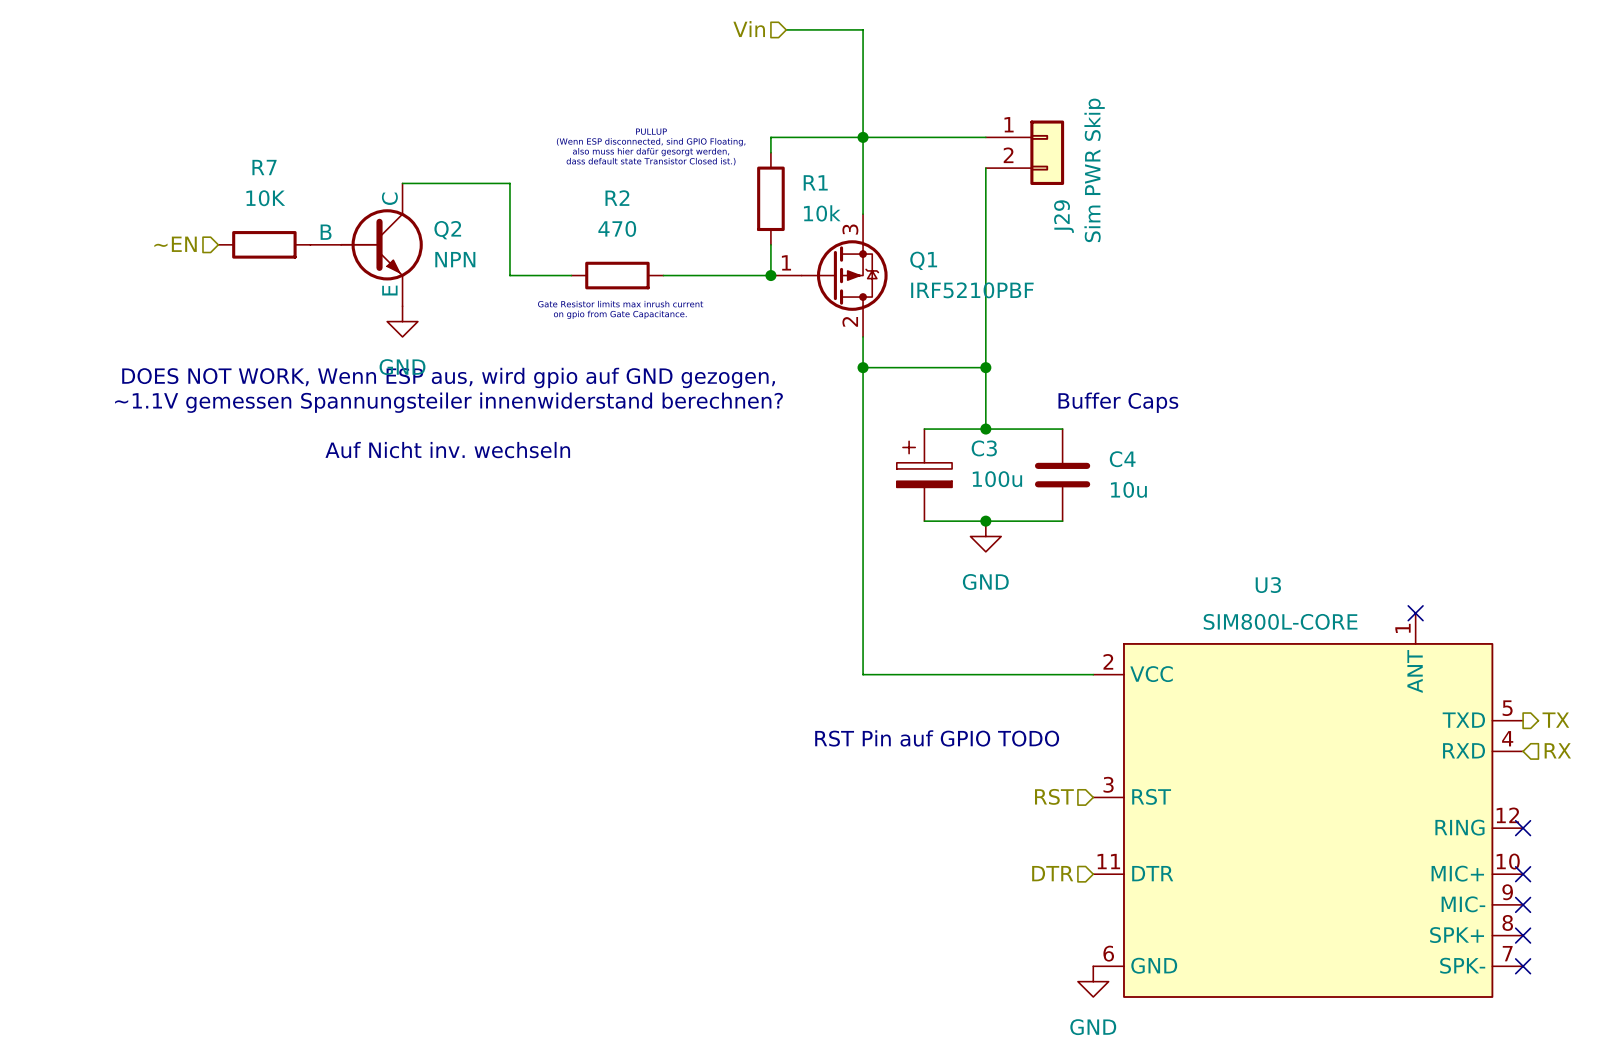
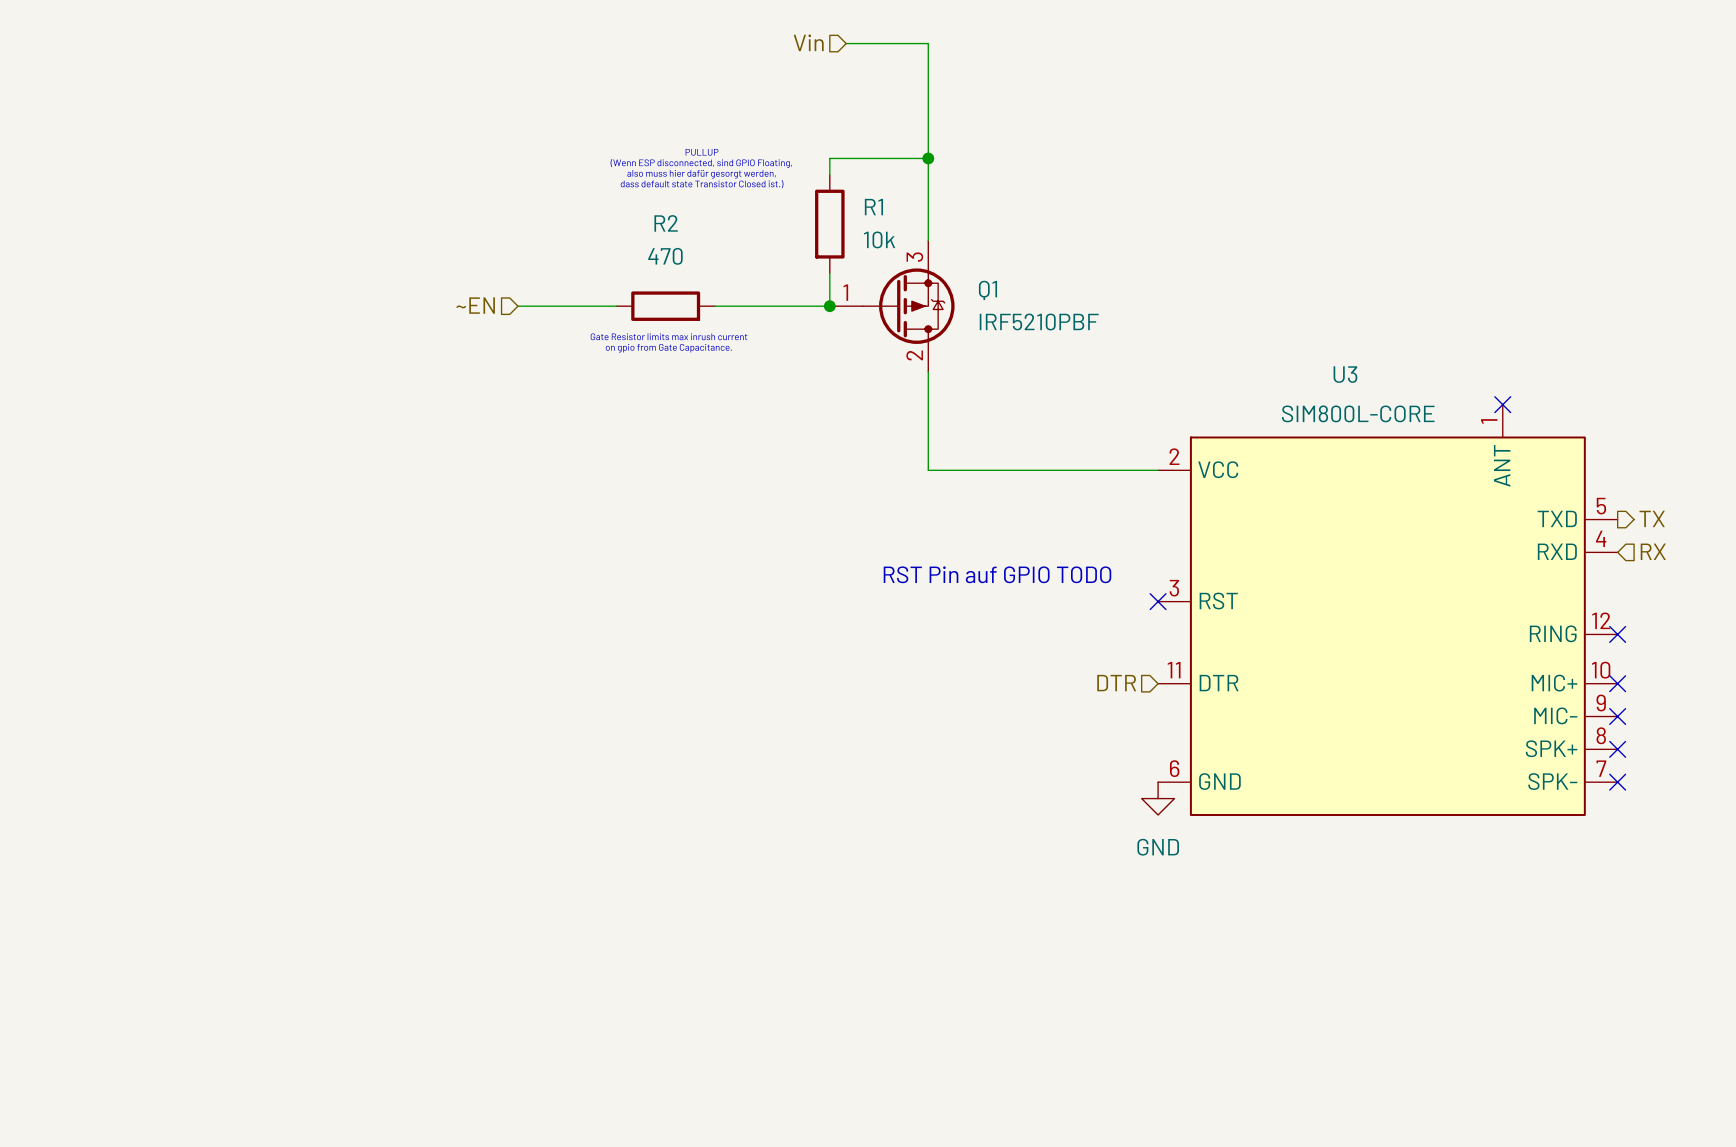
wire: (863, 137) (985, 137) -> none
J29: Sim PWR Skip (1024, 152) -> none
wire: (985, 168) (985, 429) -> none
wire: (402, 183) (509, 183) (509, 275) -> (517, 306) (550, 306)
hierarchical label position: ~EN (175, 244) -> ~EN (475, 305)
R7: 10K (264, 244) -> none
Q2: NPN (366, 244) -> none
power symbol: GND (402, 321) -> none
wire: (863, 367) (985, 367) -> none
junction: (863, 367) -> none
junction: (985, 367) -> none
no-connect mark: none -> (1502, 404)
text: DOES NOT WORK, Wenn ESP aus, wird gpio auf GND gezogen, (448, 377) -> none
text: ~1.1V gemessen Spannungsteiler innenwiderstand berechnen? (448, 402) -> none
text: Buffer Caps (1118, 402) -> none
wire: (863, 429) (863, 674) (1093, 674) -> (928, 470) (993, 470)
junction: (985, 429) -> none
wire: none -> (1141, 470) (1158, 470)
text: Auf Nicht inv. wechseln (447, 450) -> none
C3: 100u (924, 475) -> none
C4: 10u (1062, 475) -> none
wire: (924, 521) (1062, 521) -> none
junction: (985, 521) -> none
power symbol: GND (985, 536) -> none
no-connect mark: none -> (1158, 601)
no-connect mark: none -> (1617, 634)
no-connect mark: (1415, 613) -> none
no-connect mark: none -> (1617, 683)
no-connect mark: none -> (1617, 716)
no-connect mark: none -> (1617, 749)
no-connect mark: none -> (1617, 782)
hierarchical label position: TX (1555, 720) -> TX (1652, 518)
power symbol: none -> GND (1158, 798)
text position: RST Pin auf GPIO TODO (937, 738) -> RST Pin auf GPIO TODO (997, 574)
hierarchical label position: RX (1557, 750) -> RX (1653, 551)
hierarchical label: RST (1054, 796) -> none
U3 position: (1308, 805) -> (1387, 610)
no-connect mark: (1523, 828) -> none
hierarchical label position: DTR (1052, 873) -> DTR (1116, 683)
no-connect mark: (1523, 874) -> none
no-connect mark: (1523, 904) -> none
no-connect mark: (1523, 935) -> none
no-connect mark: (1523, 966) -> none
power symbol: GND (1093, 981) -> none

